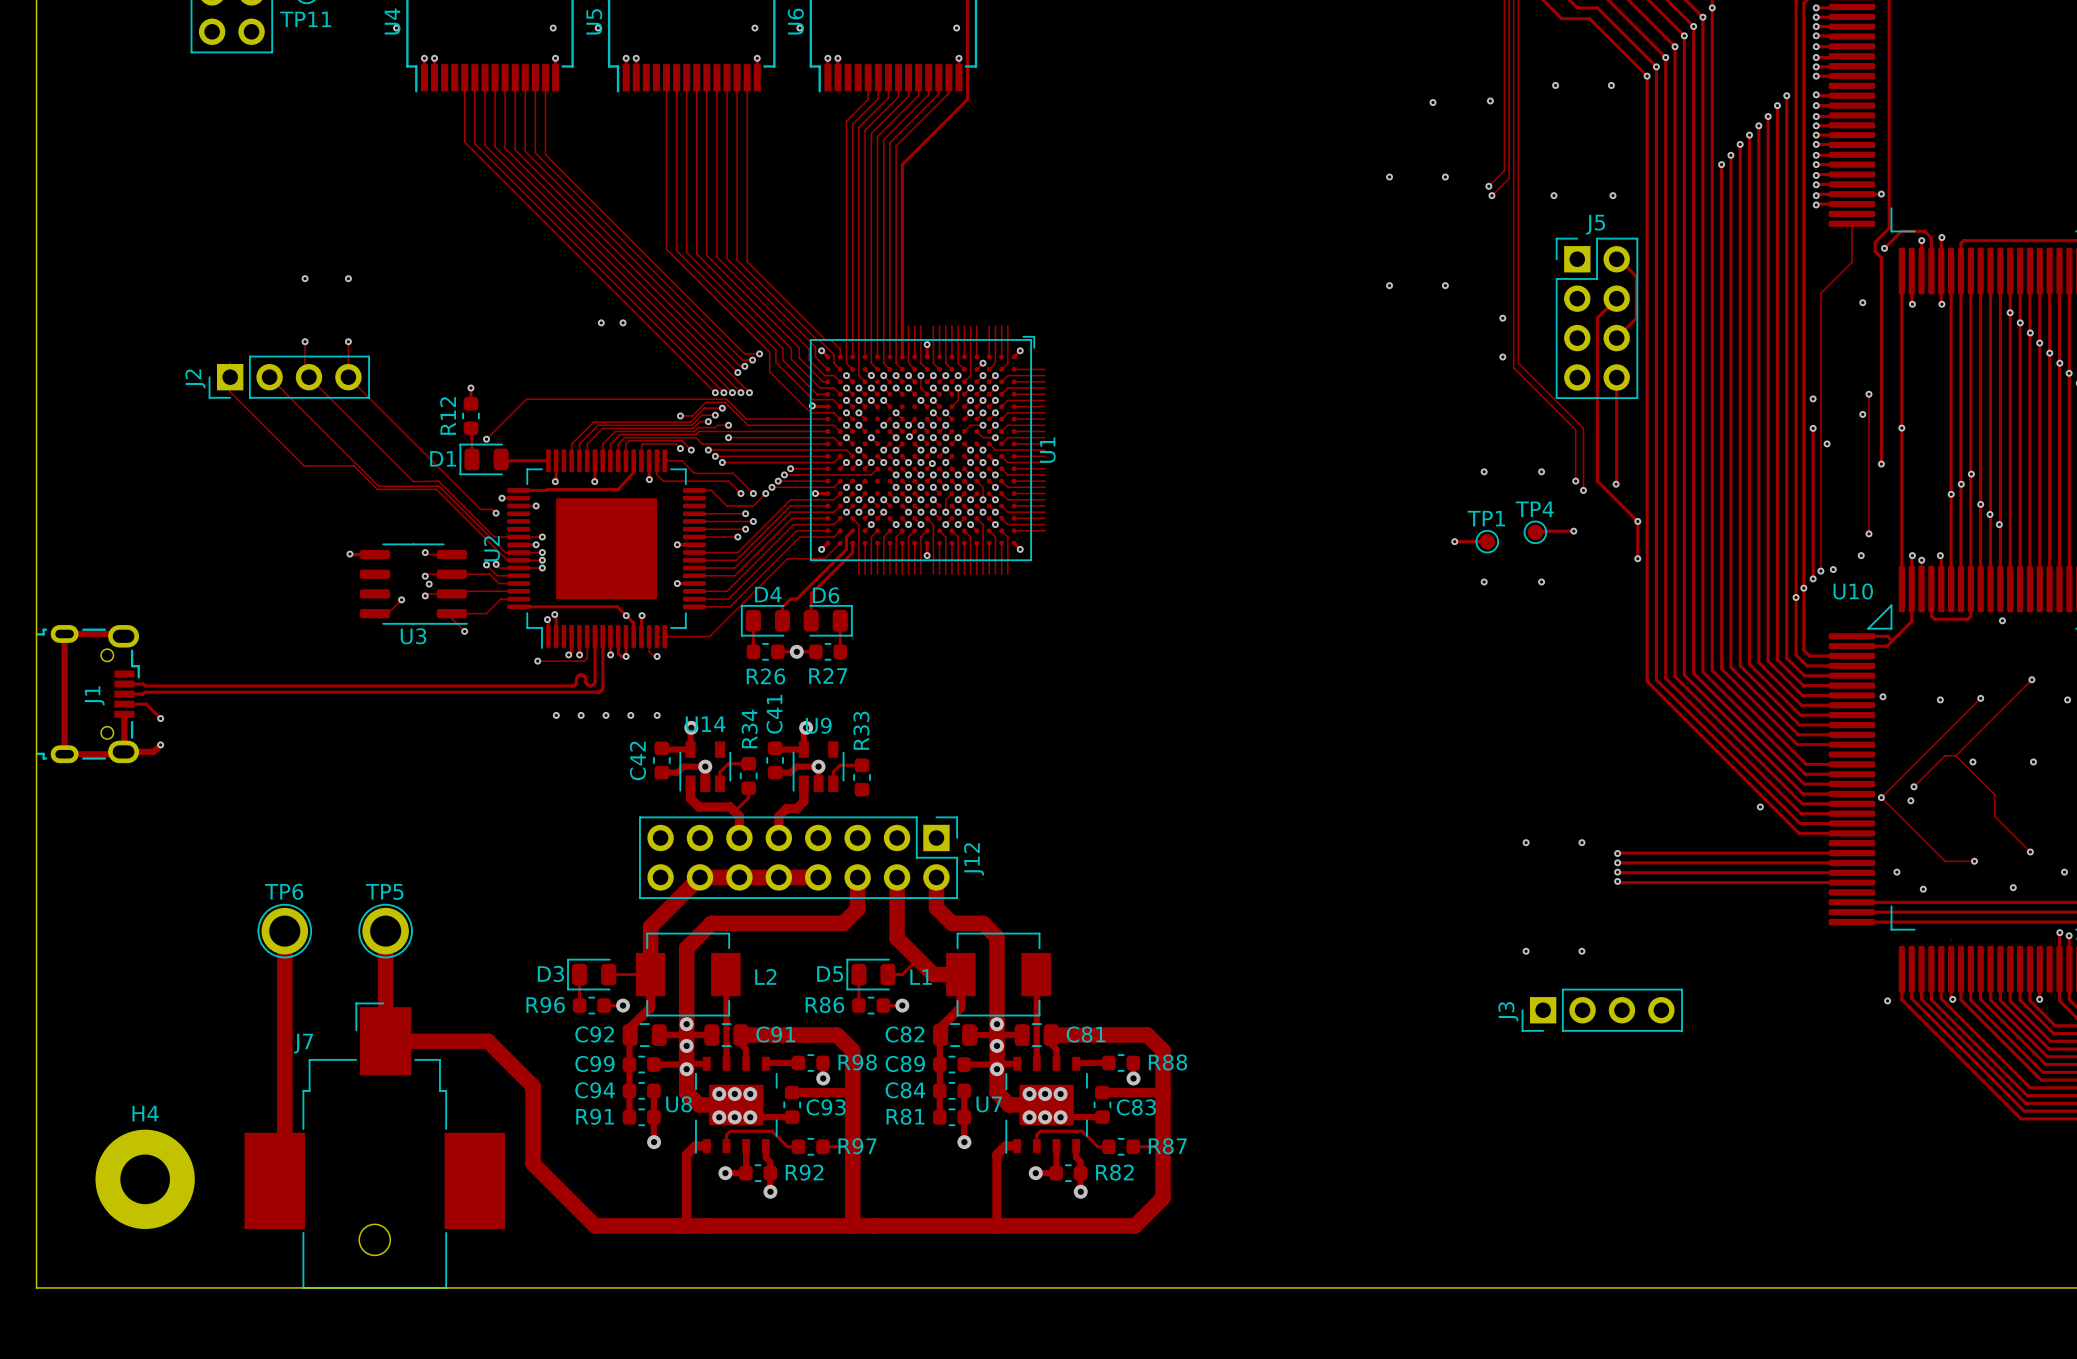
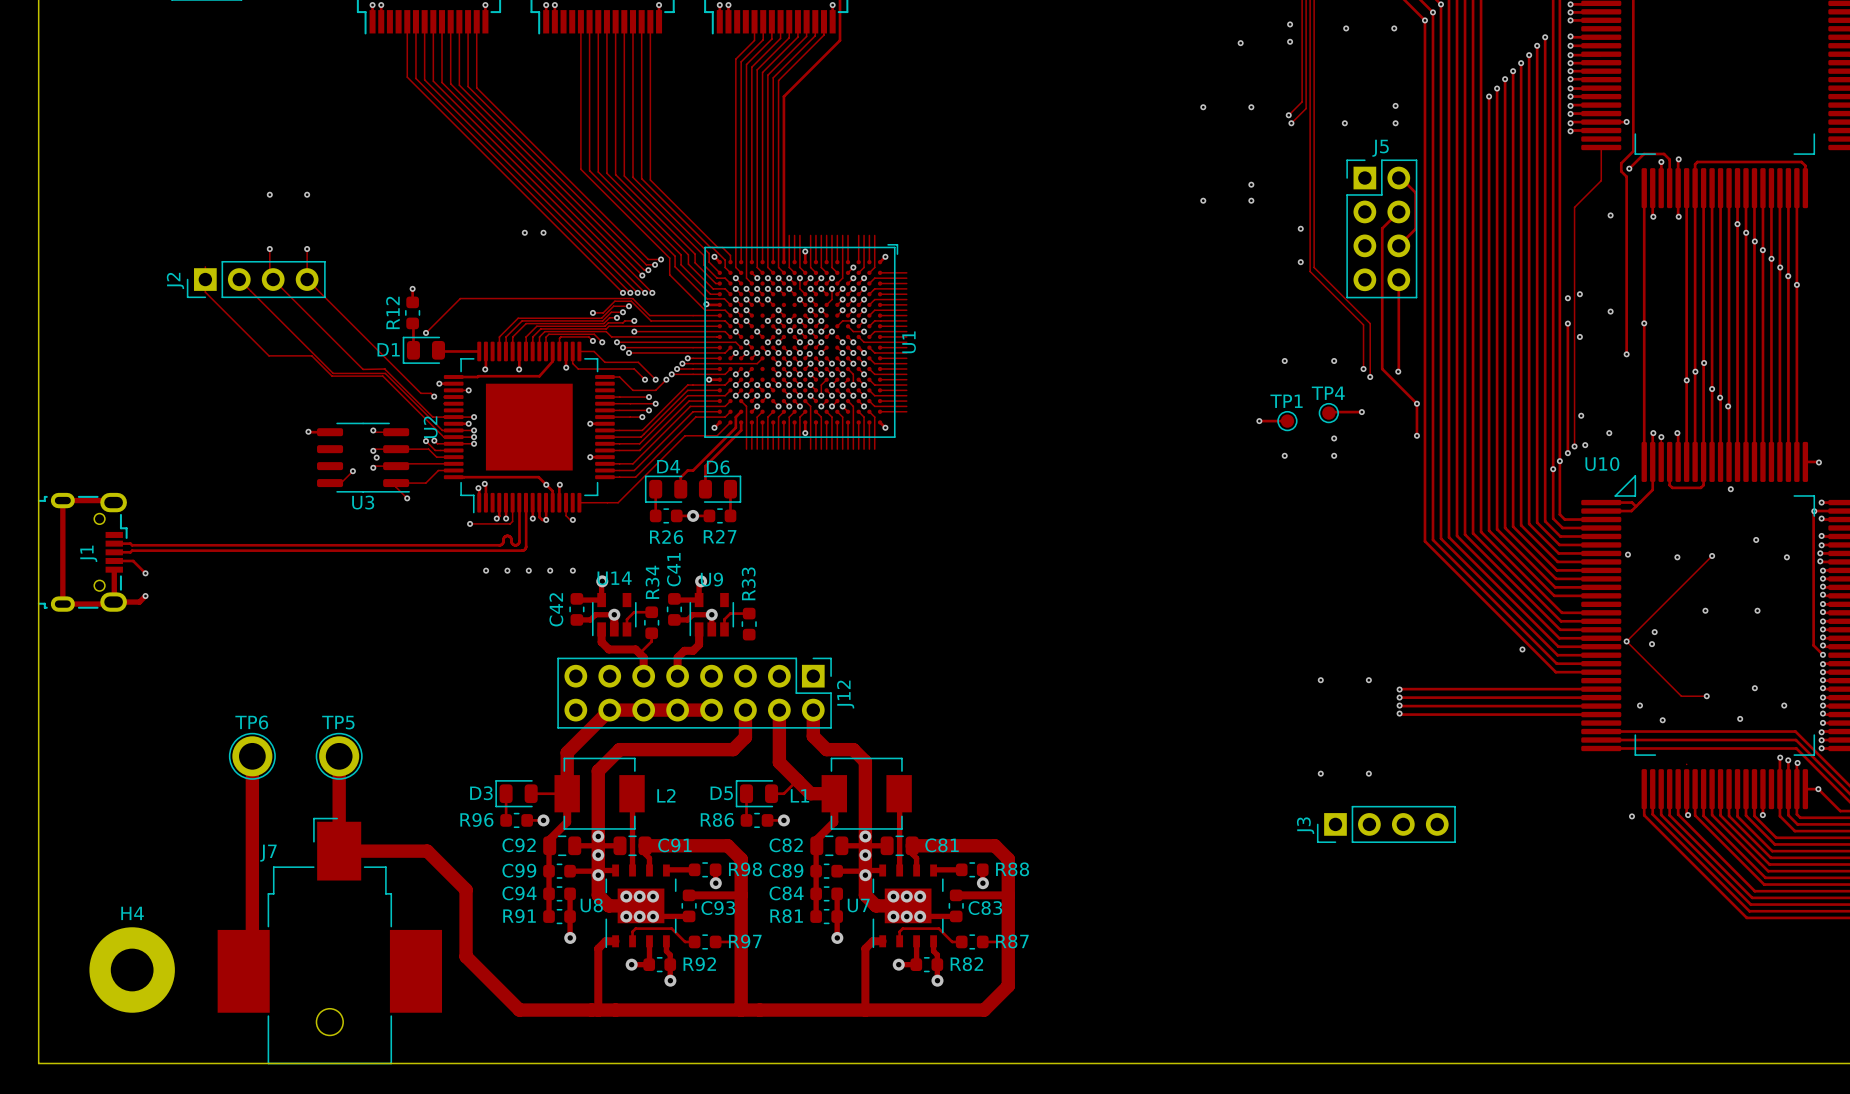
via: none -> (1290, 24)
via: none -> (1395, 105)
via: none -> (1251, 184)
track: (1868, 394) (1868, 533) -> none
via position: (1868, 394) -> (1579, 294)
via position: (1868, 533) -> (1581, 415)
via: none -> (1334, 438)
track: (2031, 679) (1955, 755) -> none
track: (1955, 755) (1945, 755) (1913, 786) -> none
track: (1955, 755) (1994, 794) (1994, 816) (2030, 851) -> none

